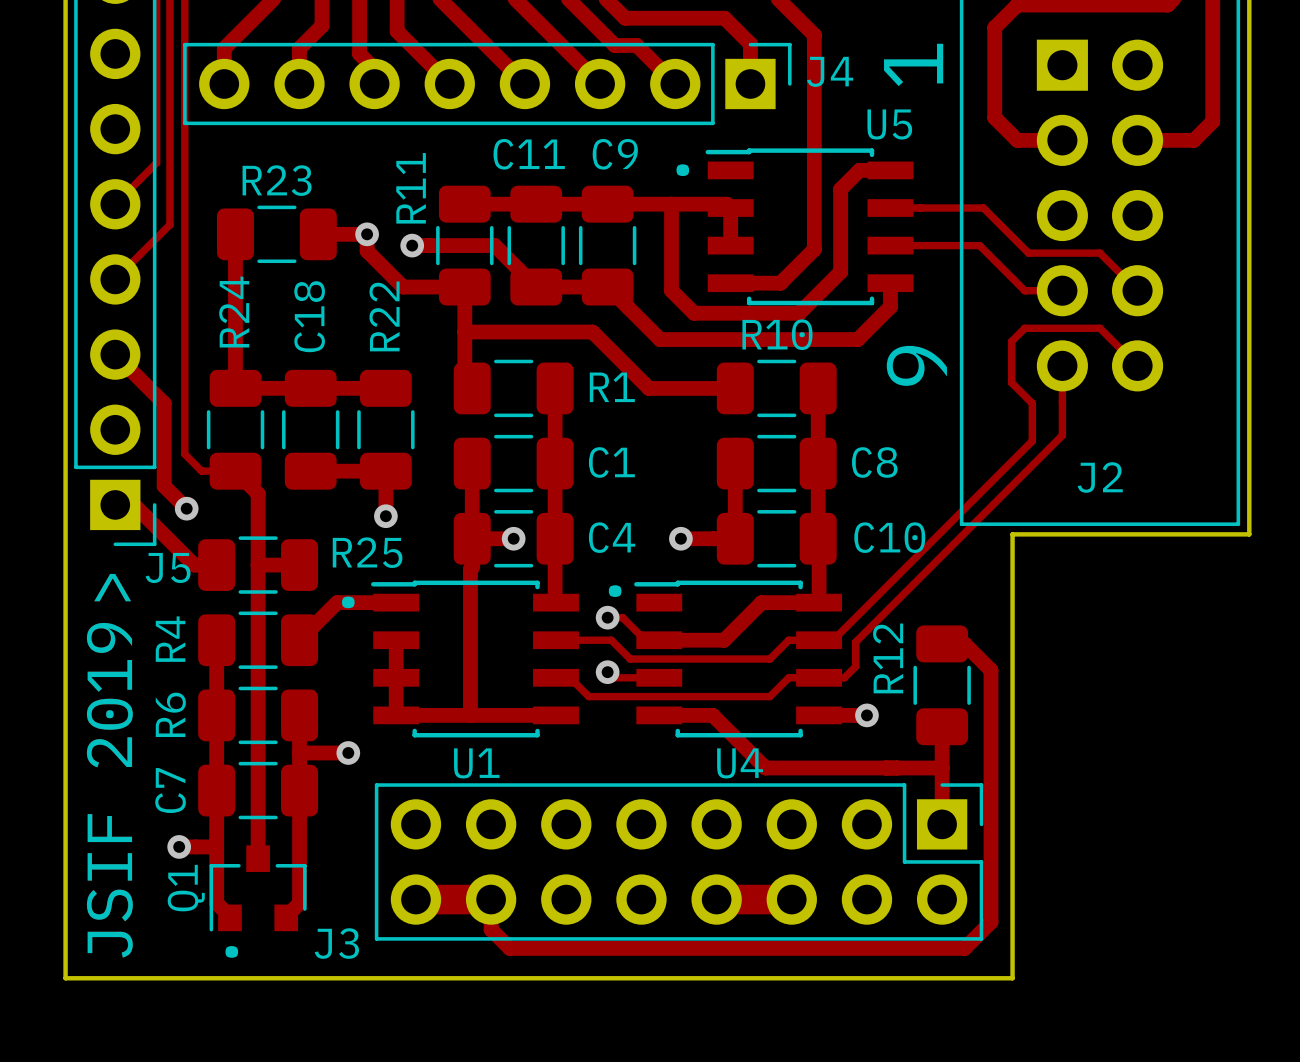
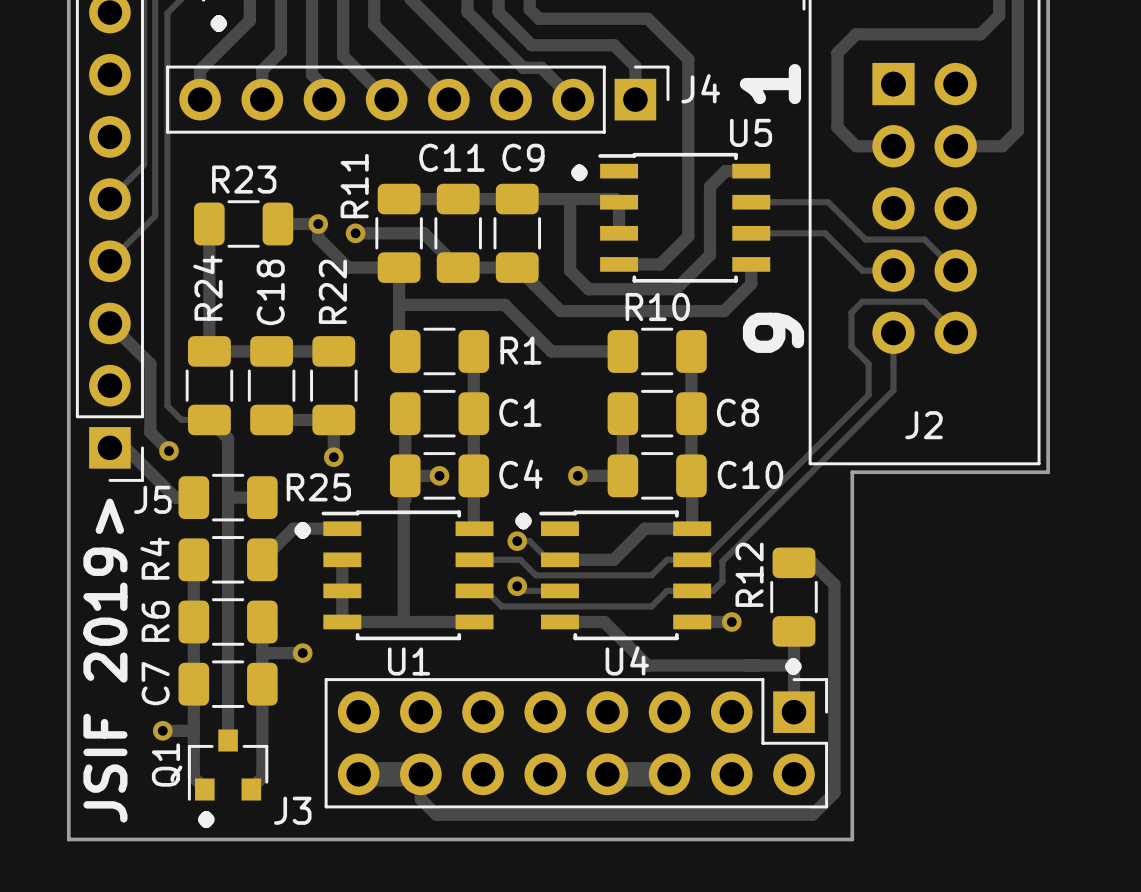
text: none -> . (793, 666)

